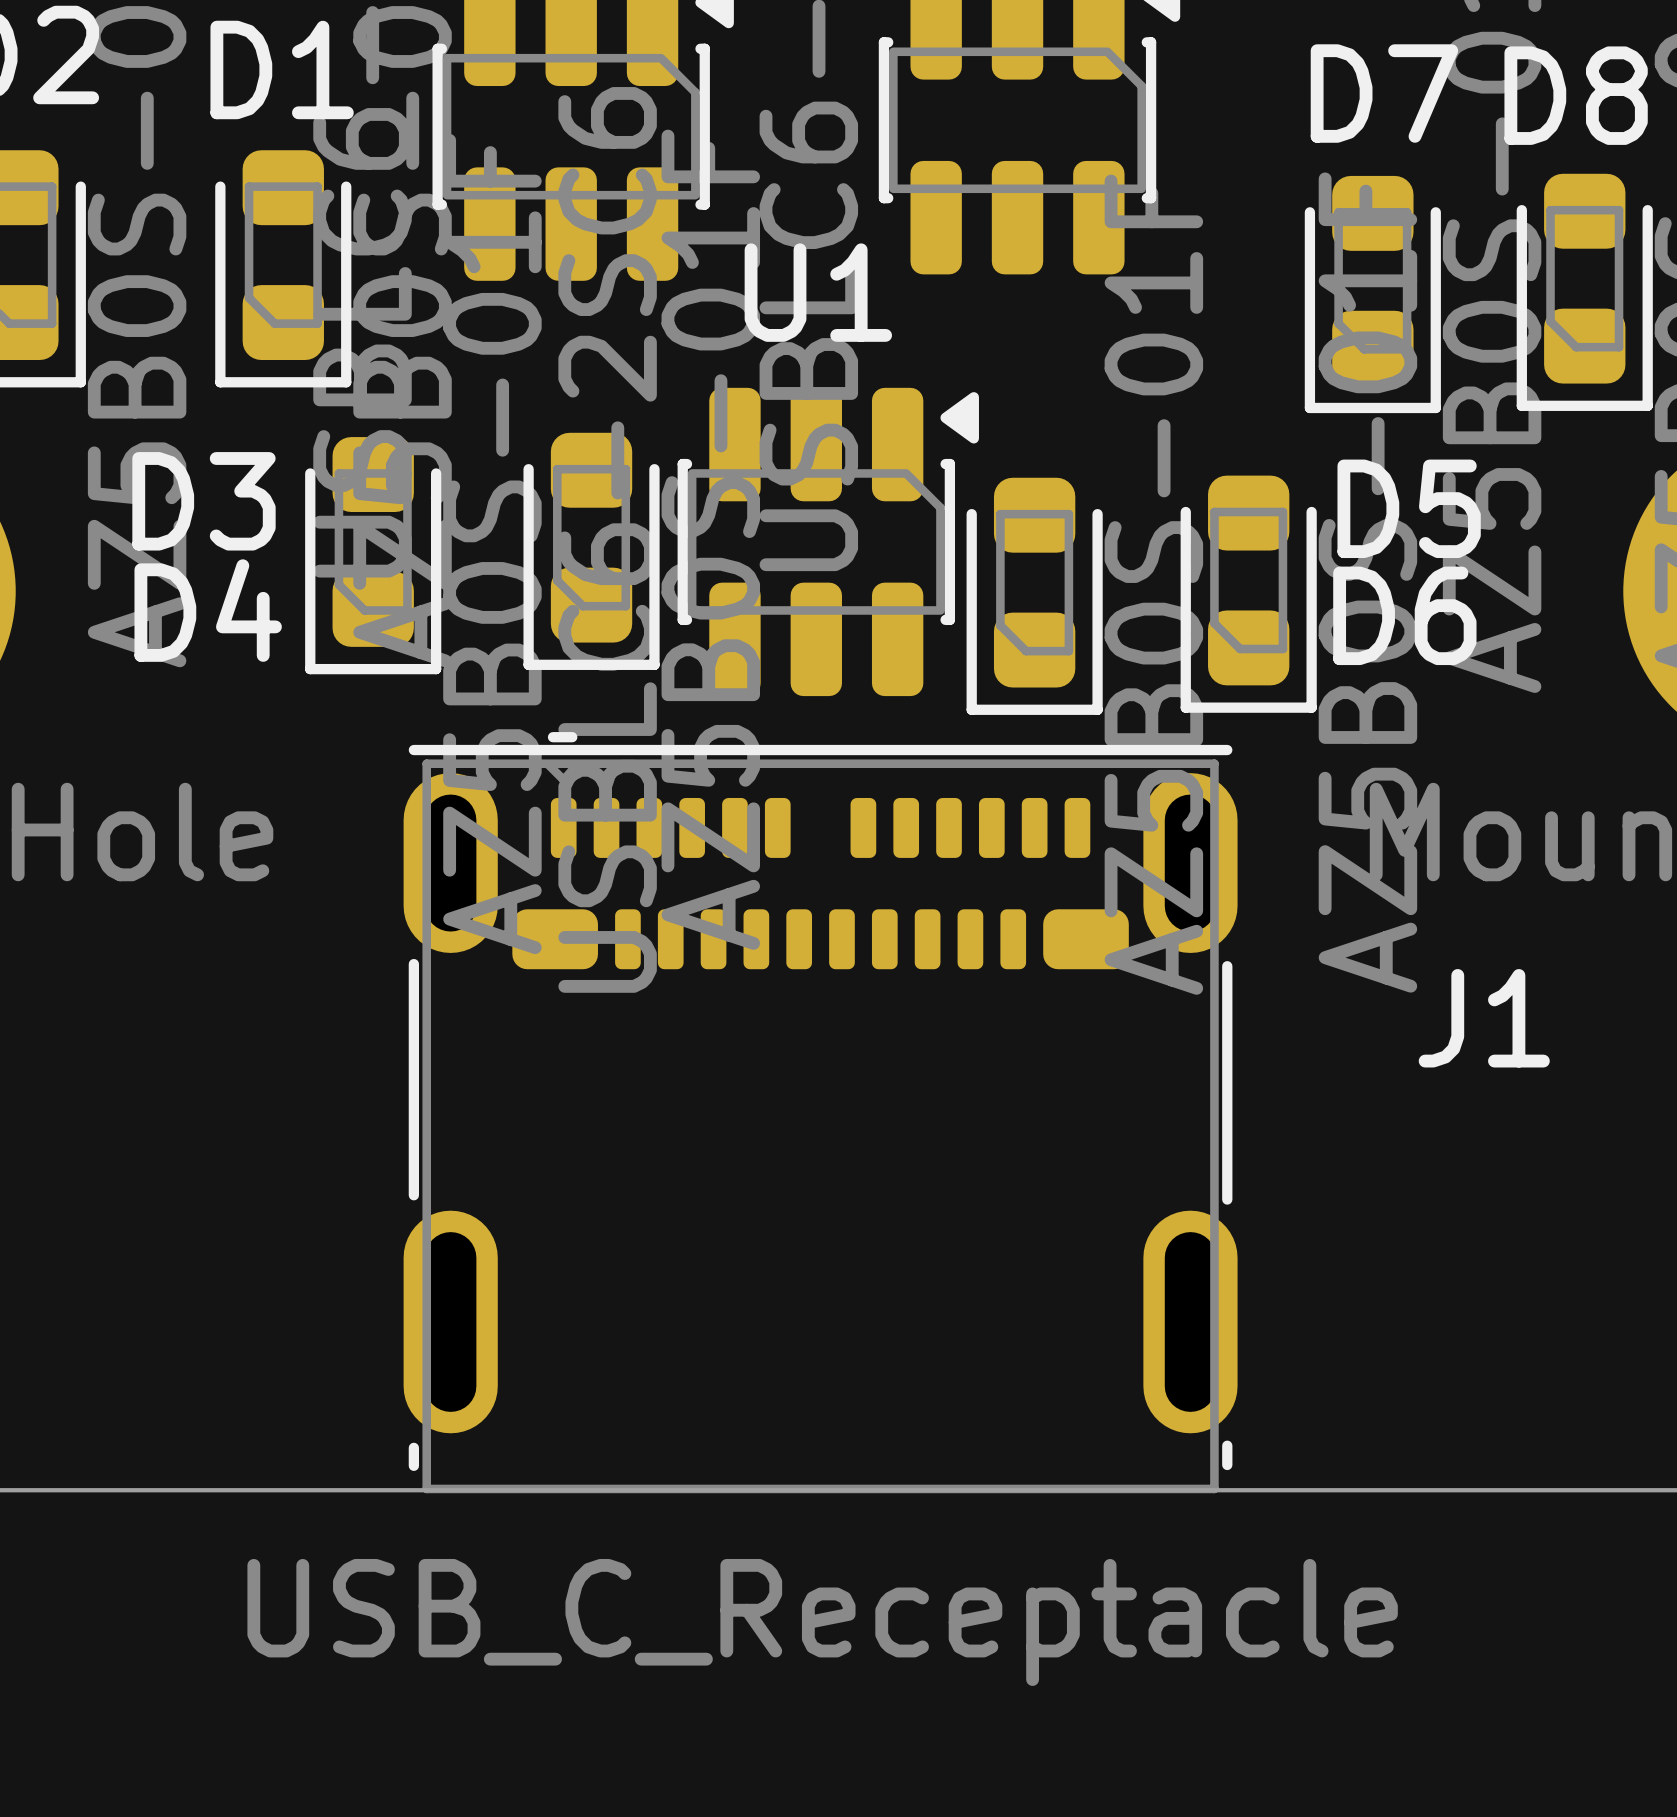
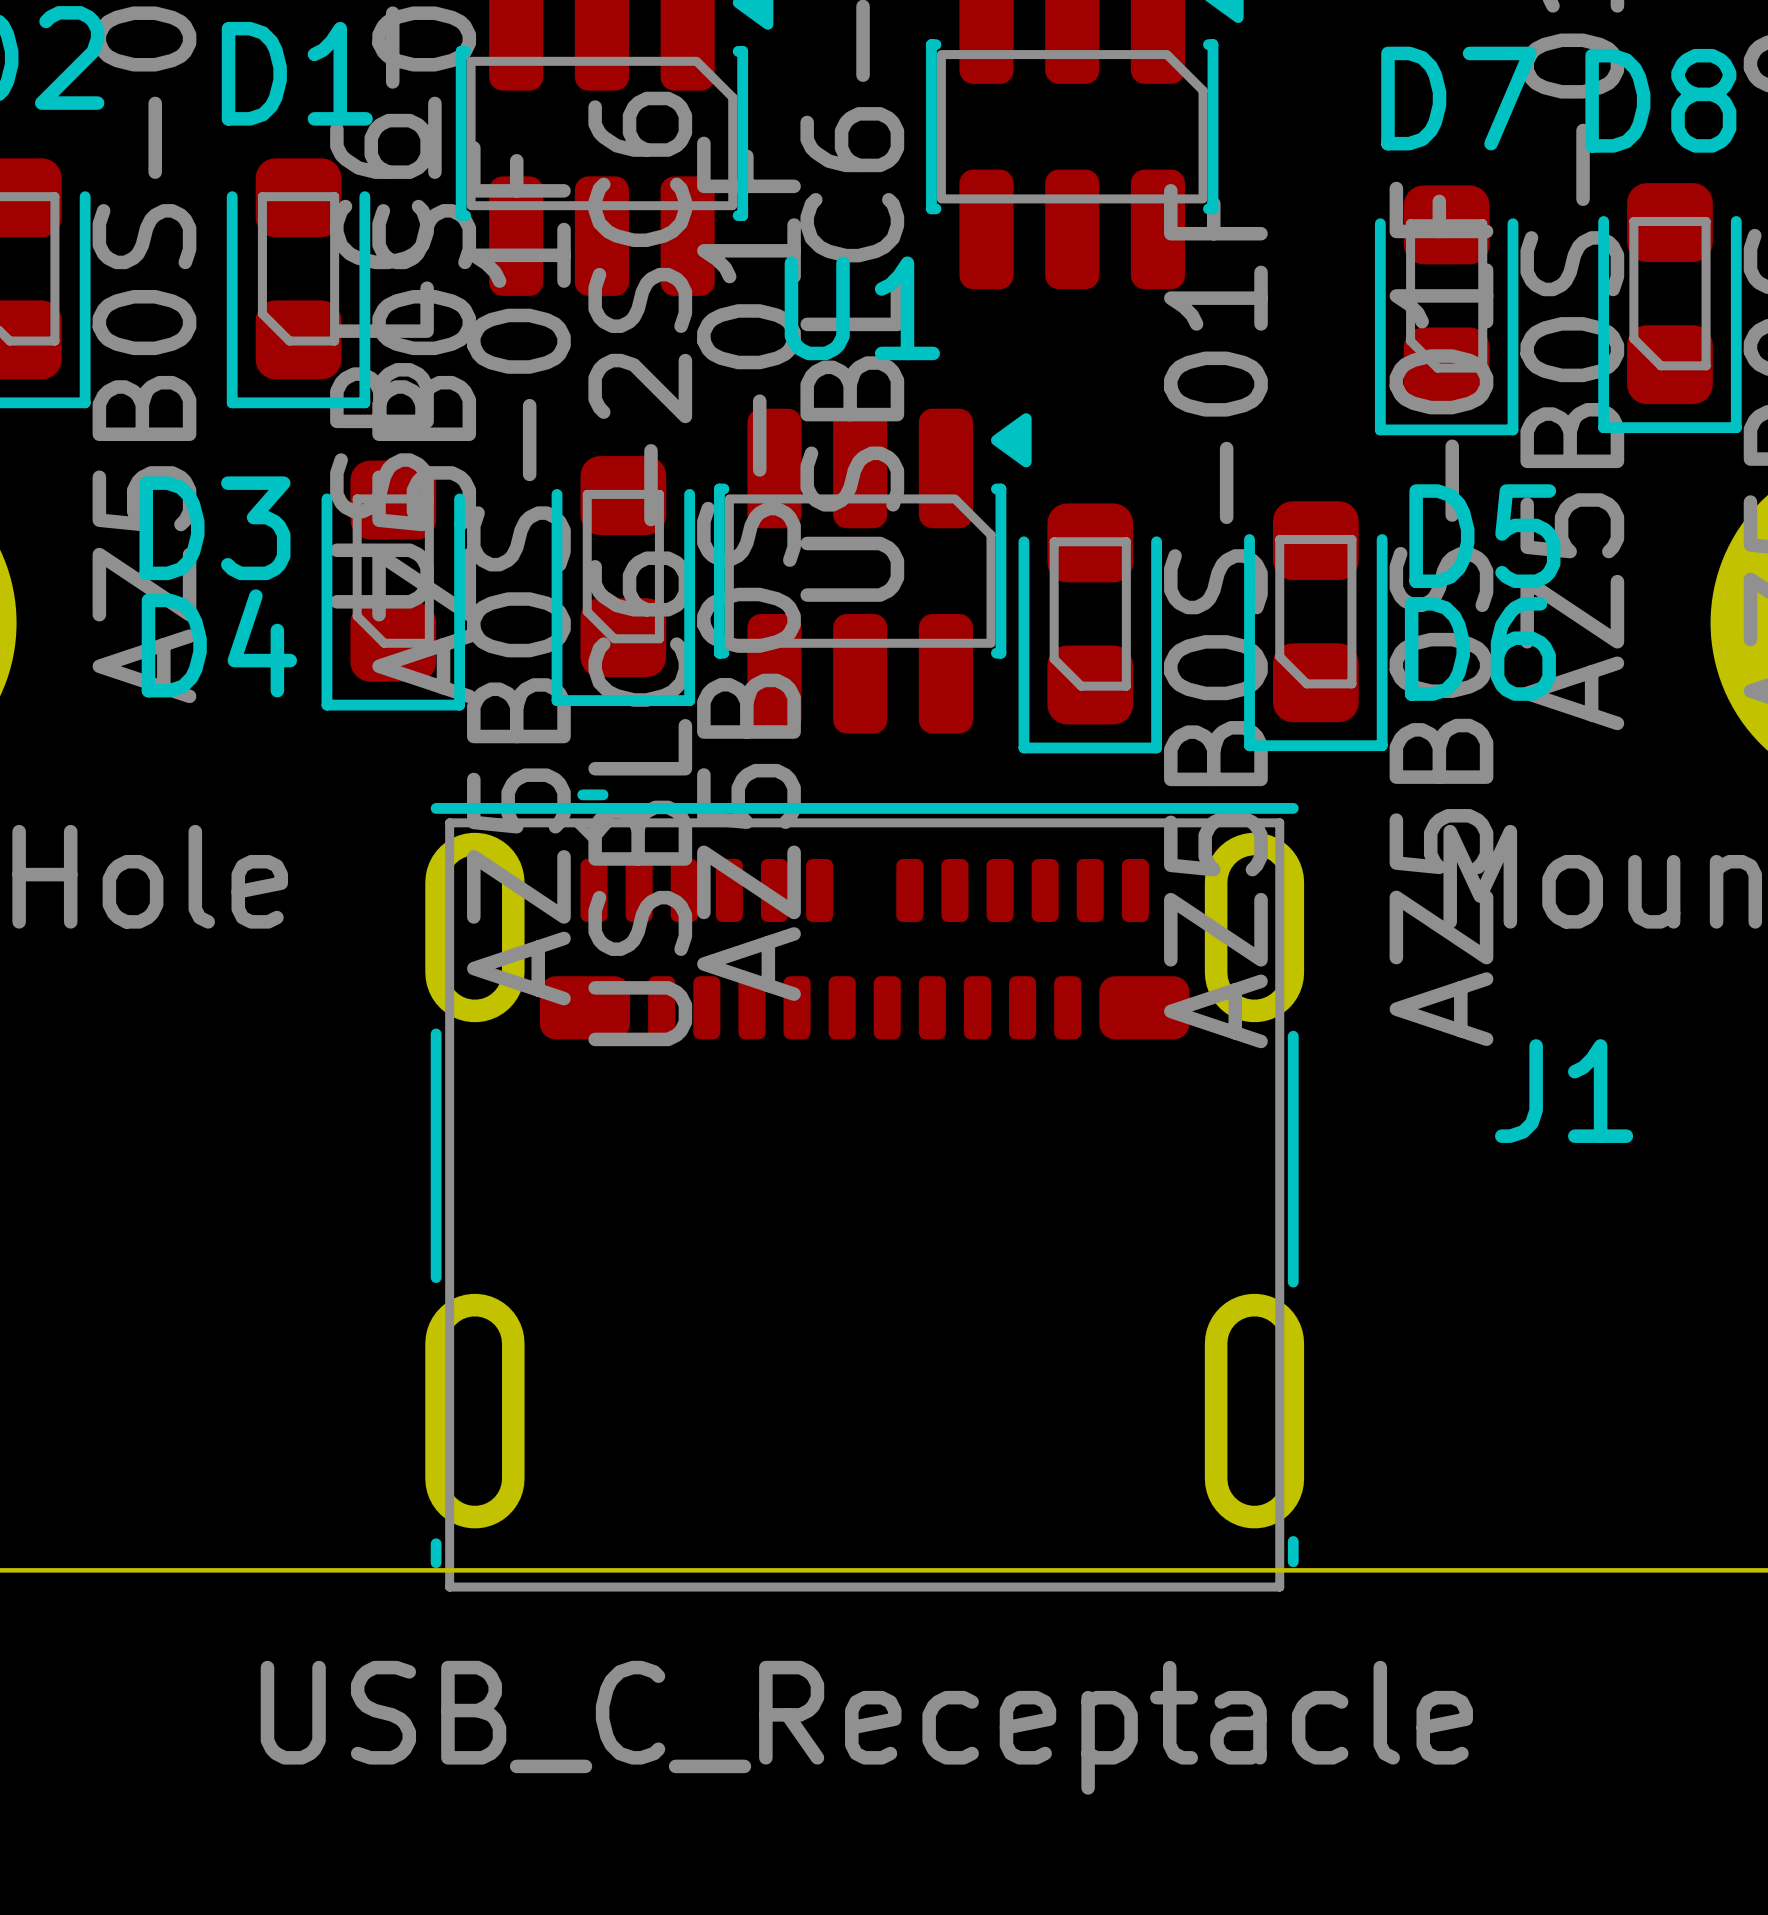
J1 position: (820, 1112) -> (864, 1190)

